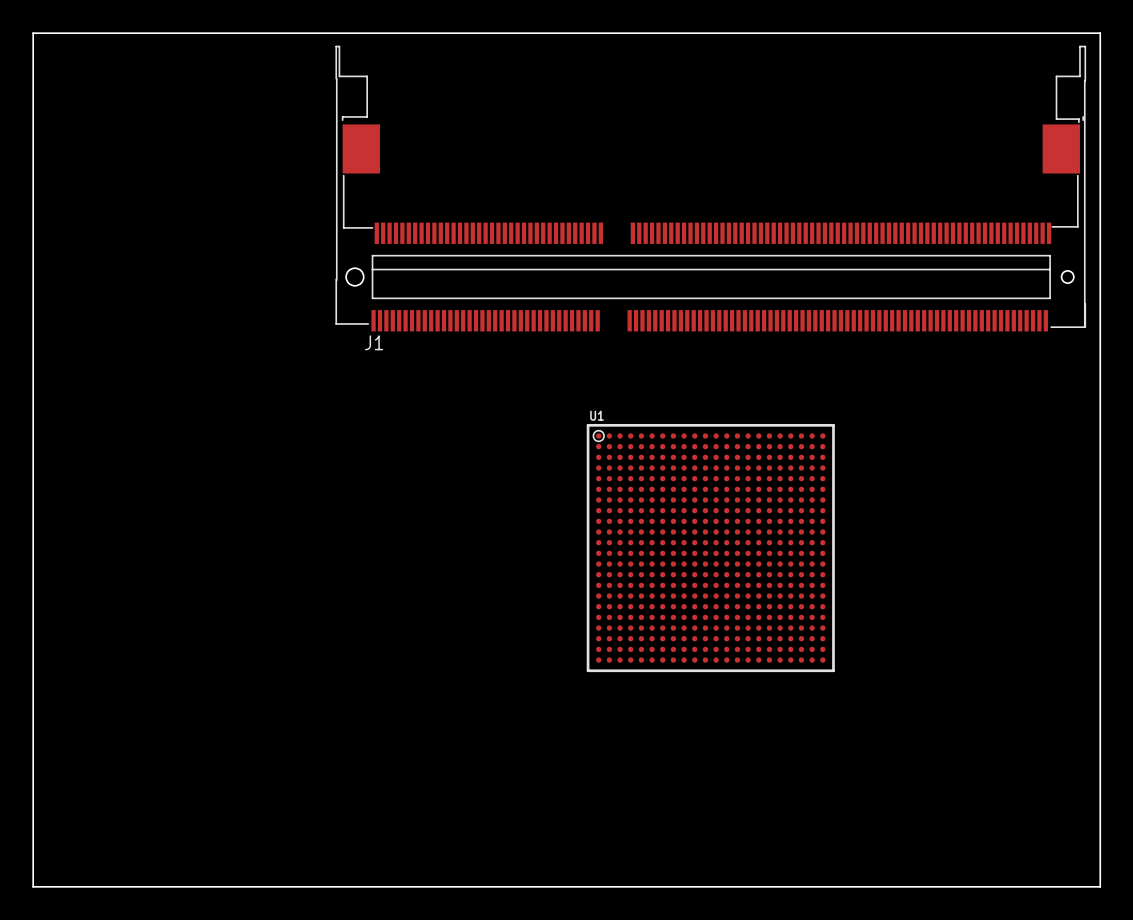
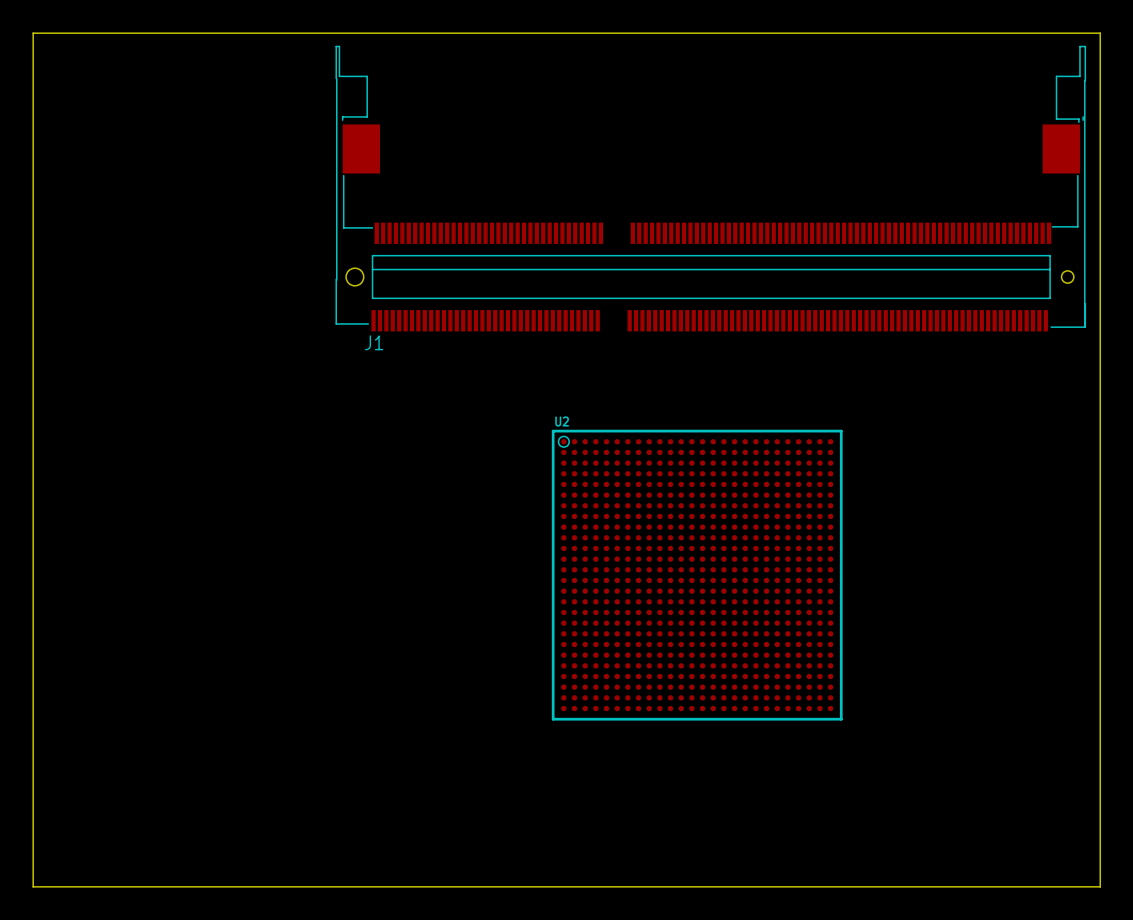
U1: (710, 548) -> none
U2: none -> (697, 575)

